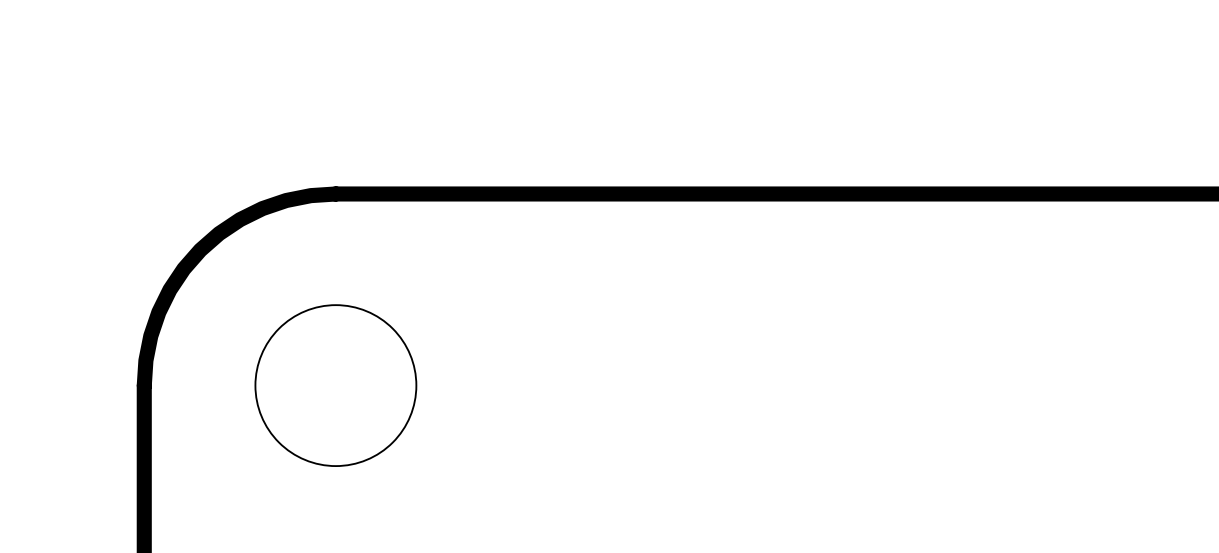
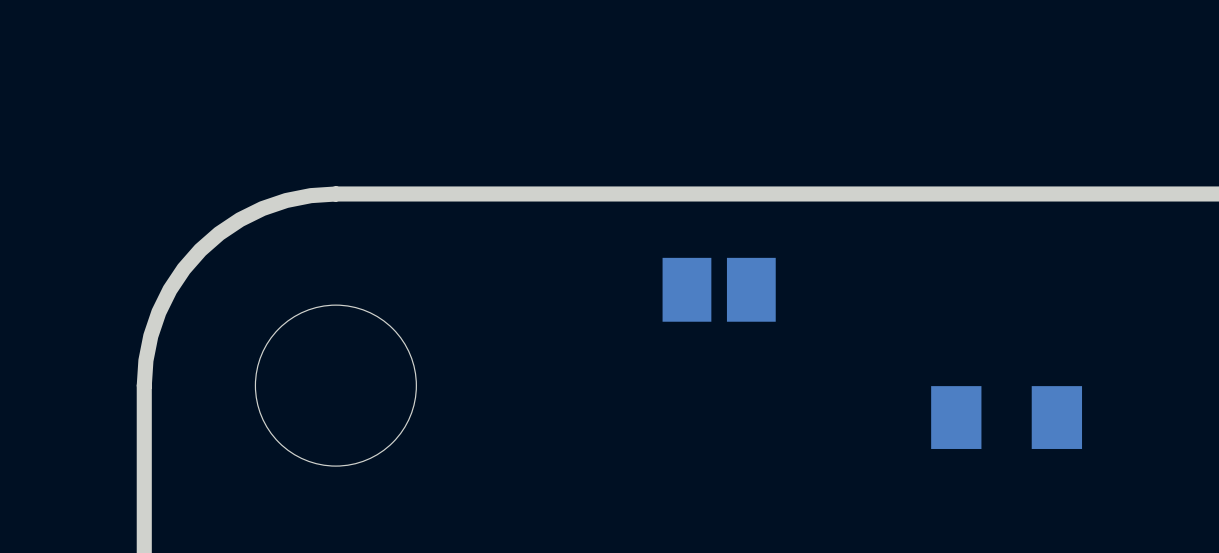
part: none -> (719, 289)
part: none -> (1006, 417)

